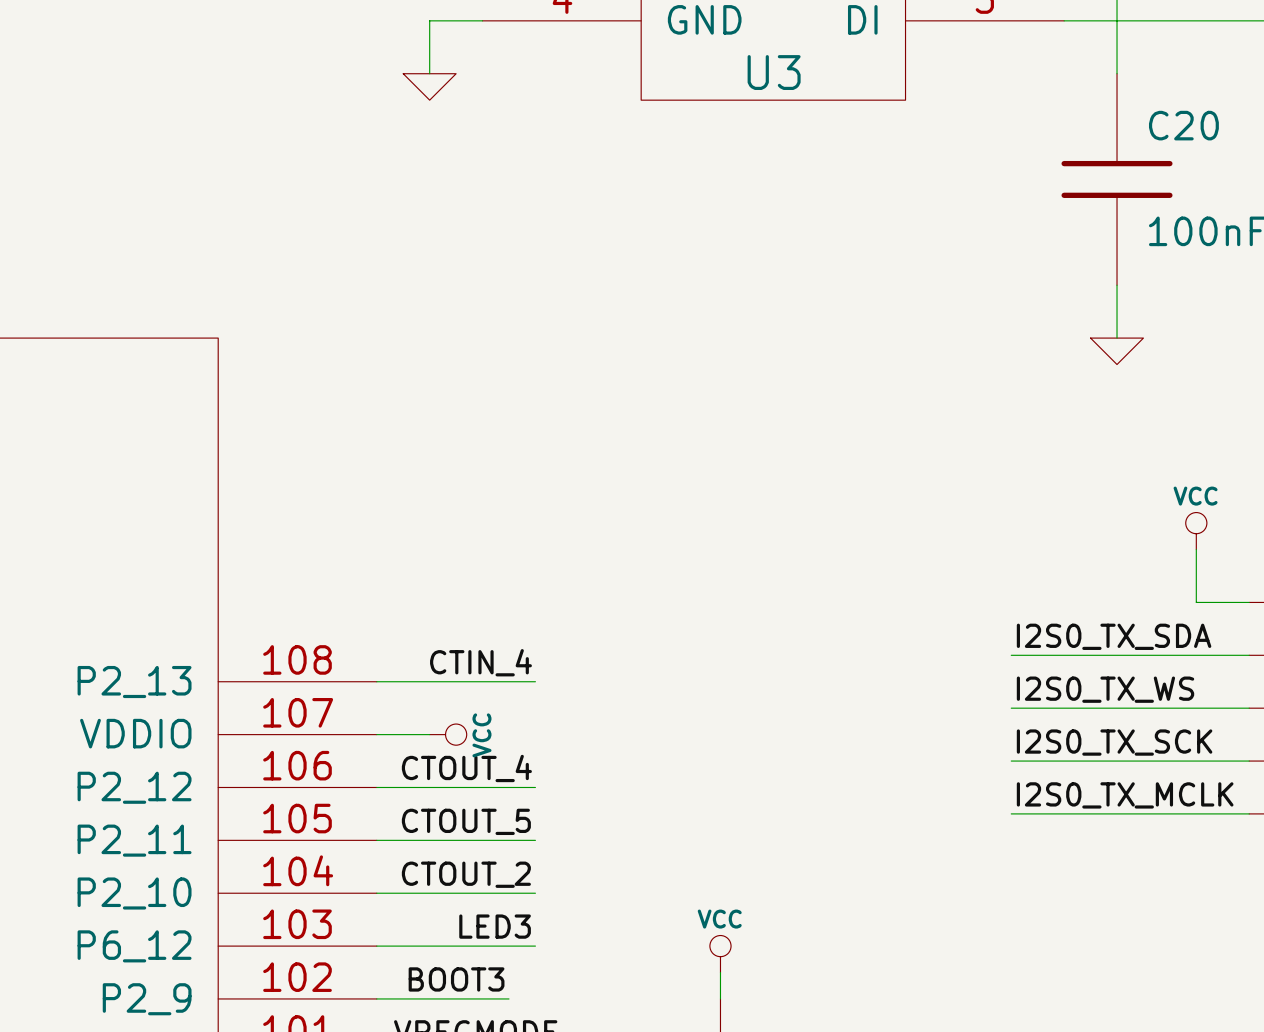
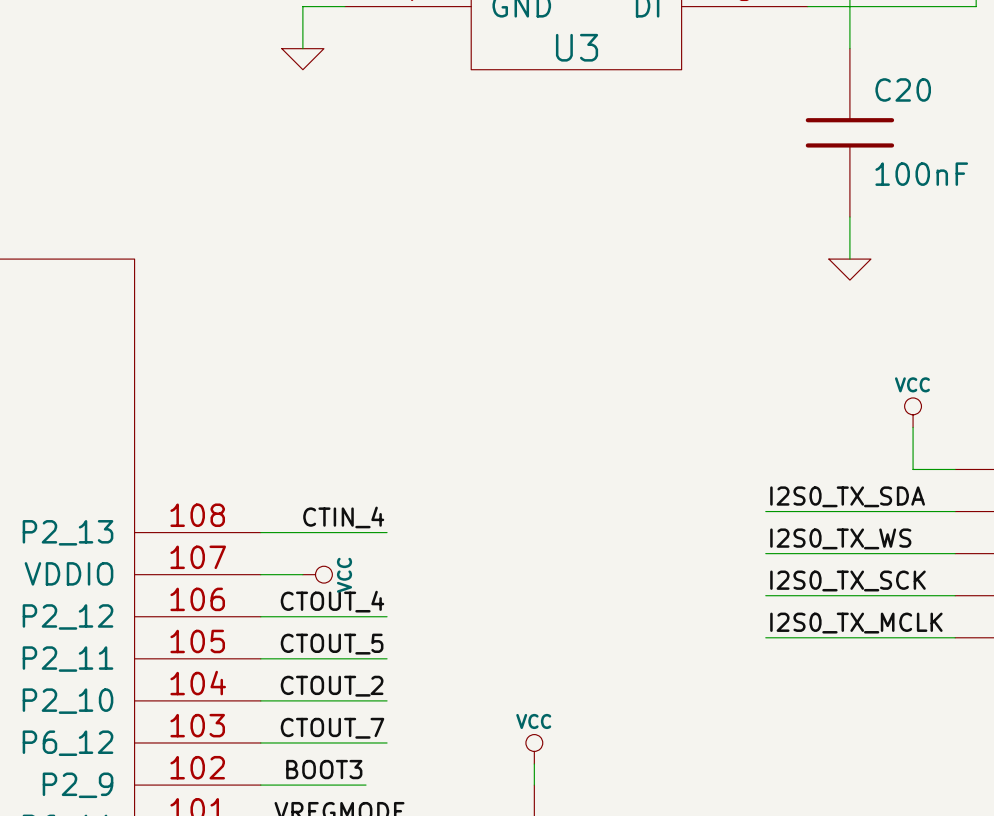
label: LED3 (495, 926) -> CTOUT_7 (332, 728)

